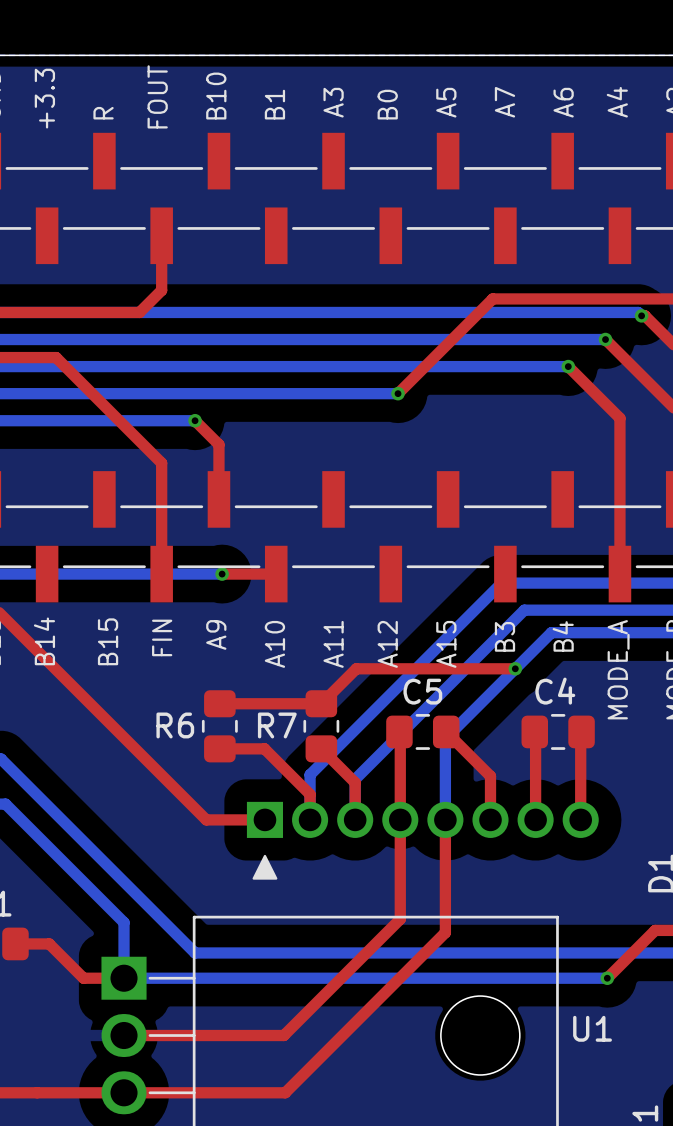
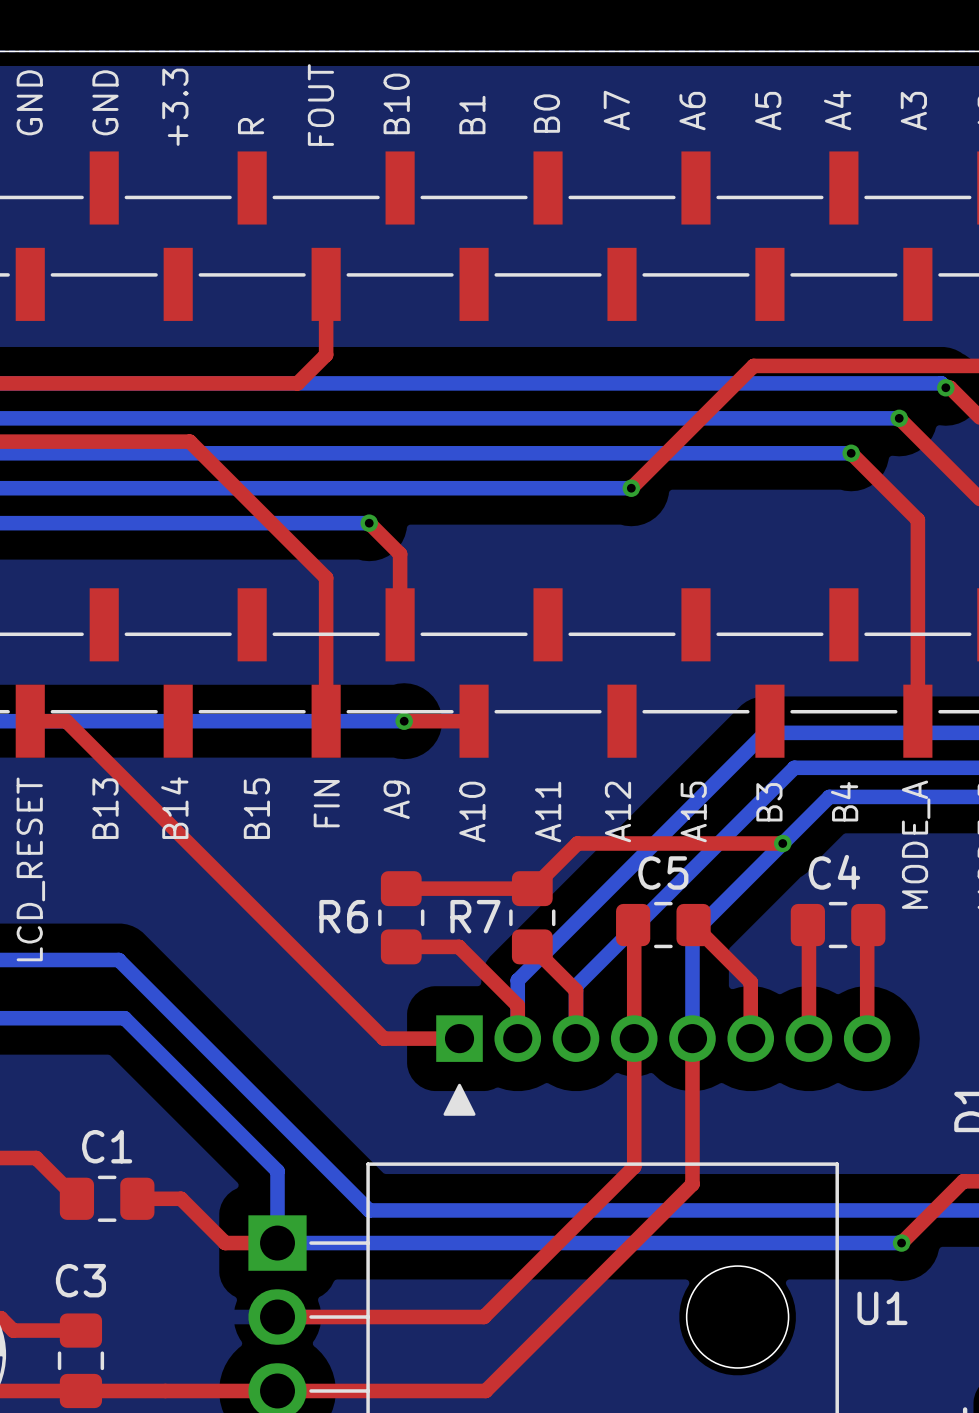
text: A3 (333, 102) -> B0 (546, 113)
text: A5 (446, 102) -> A6 (692, 111)
text: A7 (504, 102) -> A5 (768, 111)
text: A6 (563, 102) -> A4 (837, 110)
text: A4 (617, 102) -> A3 (913, 111)
text: B0 (387, 104) -> A7 (616, 110)

